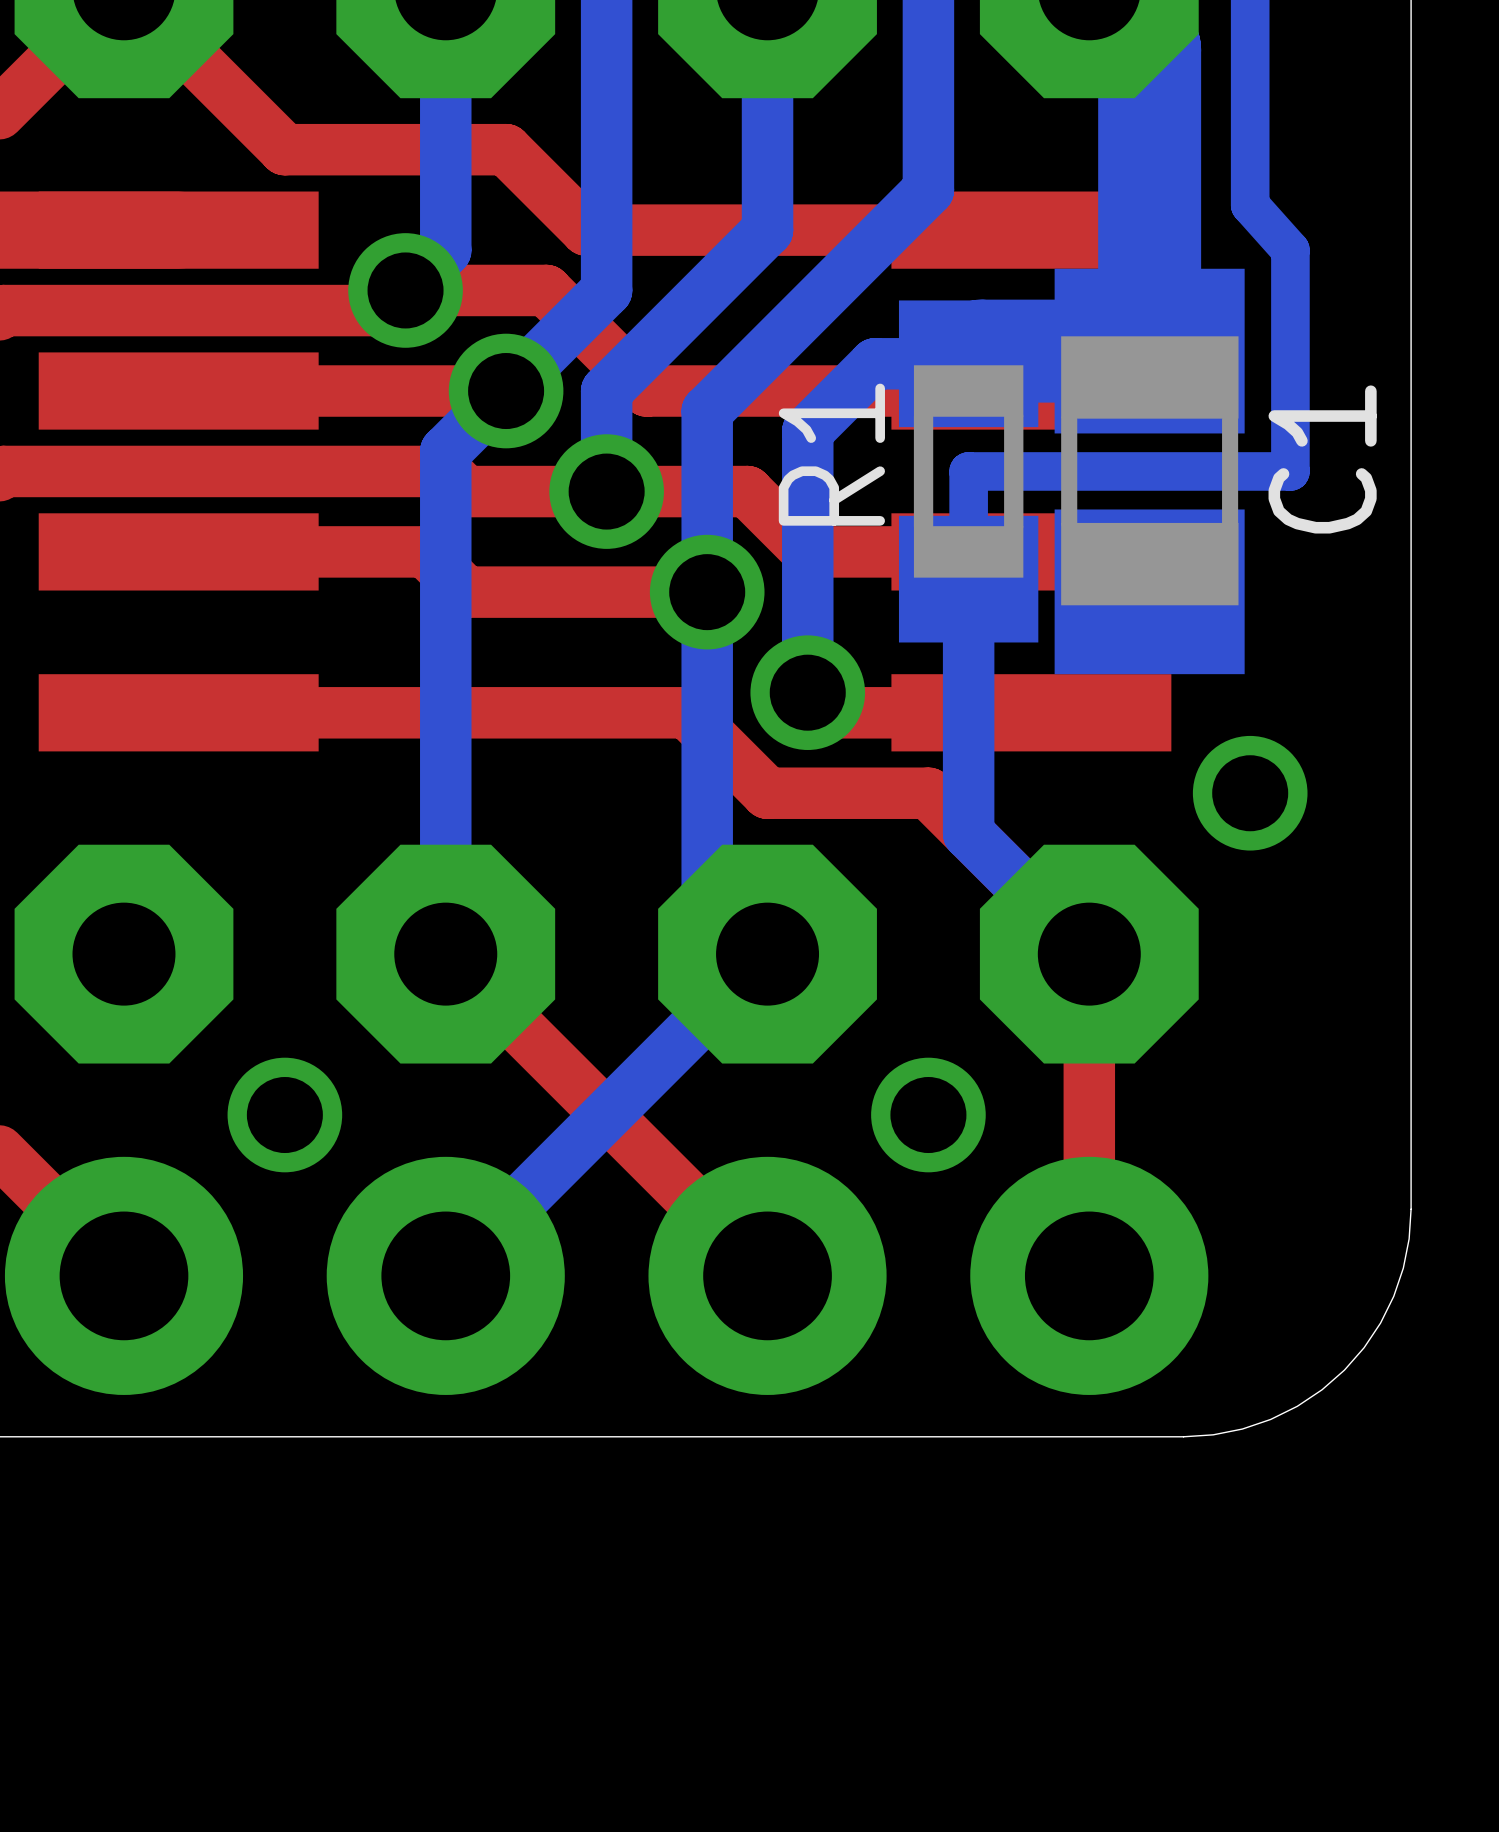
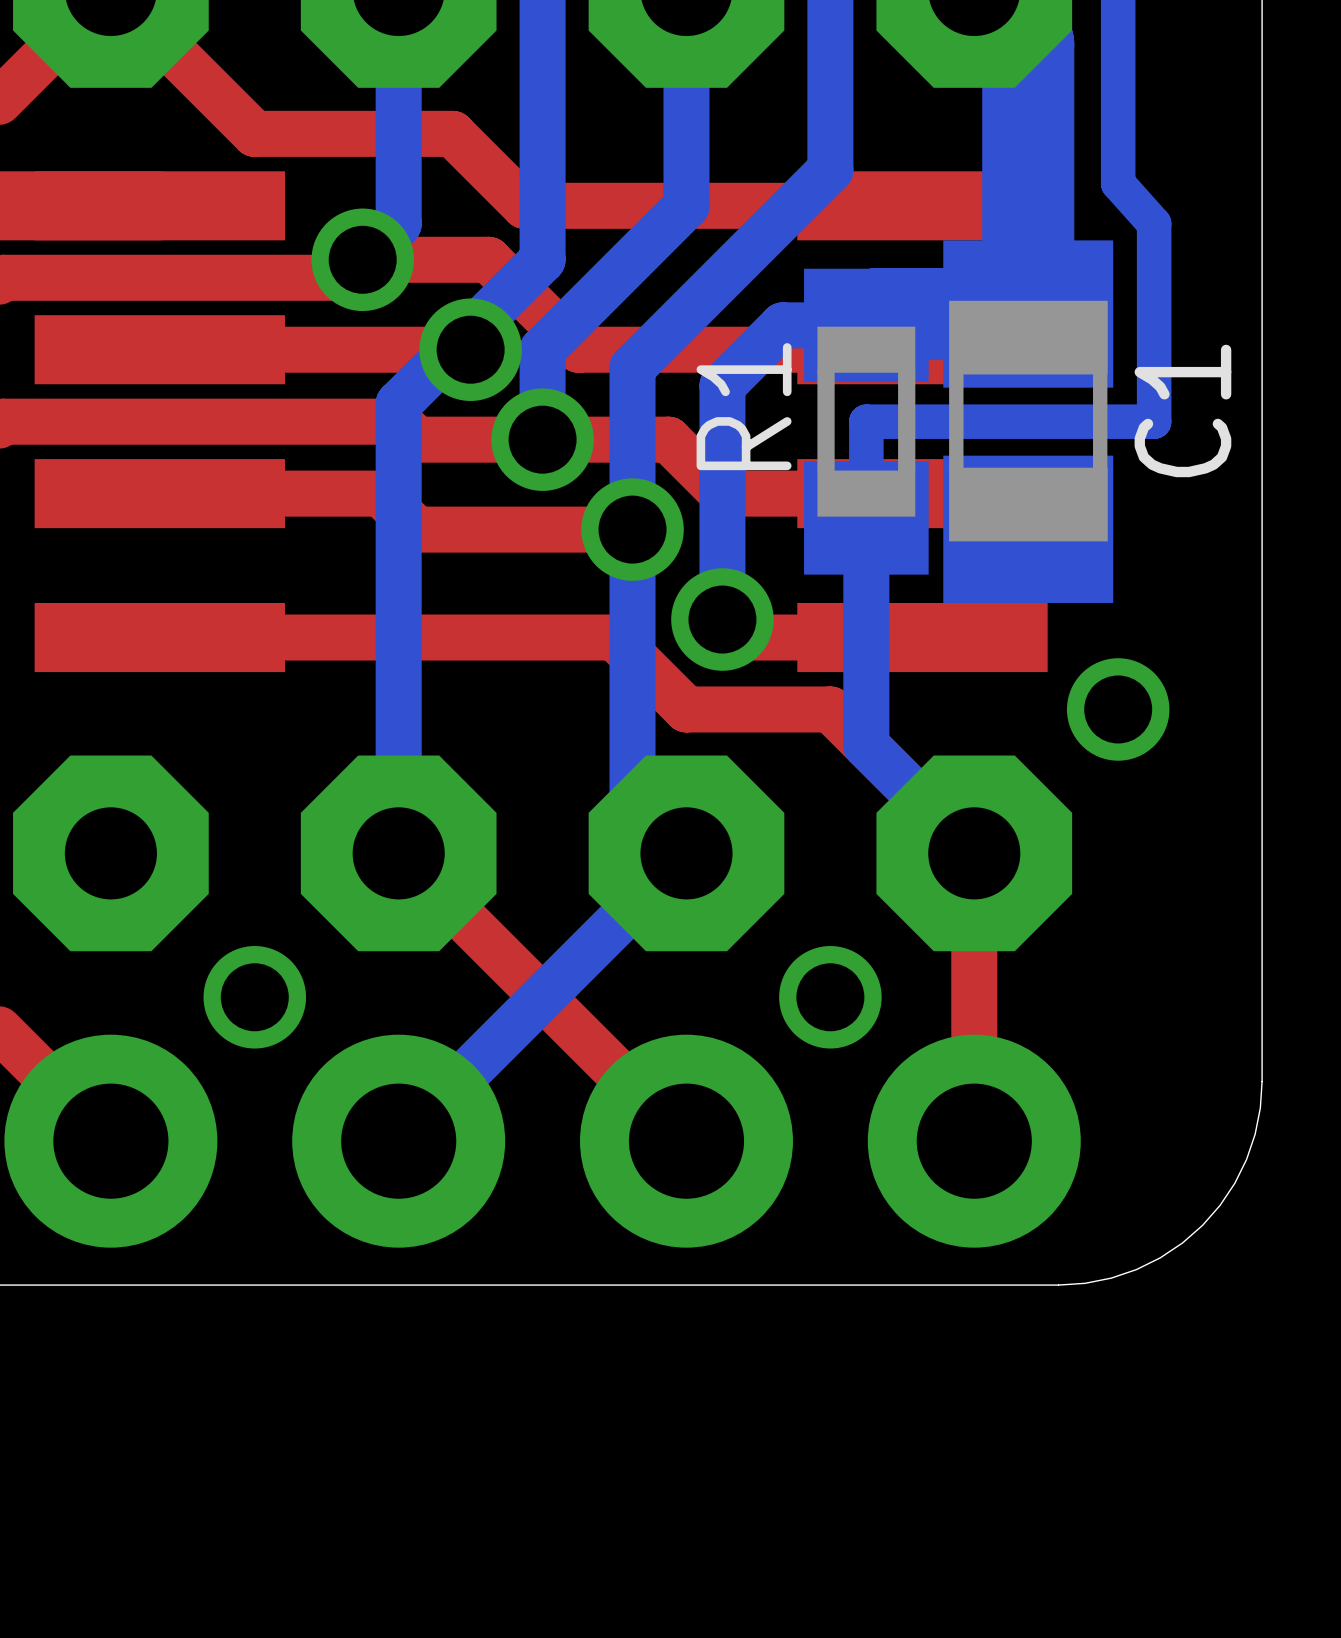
via position: (506, 391) -> (470, 349)

